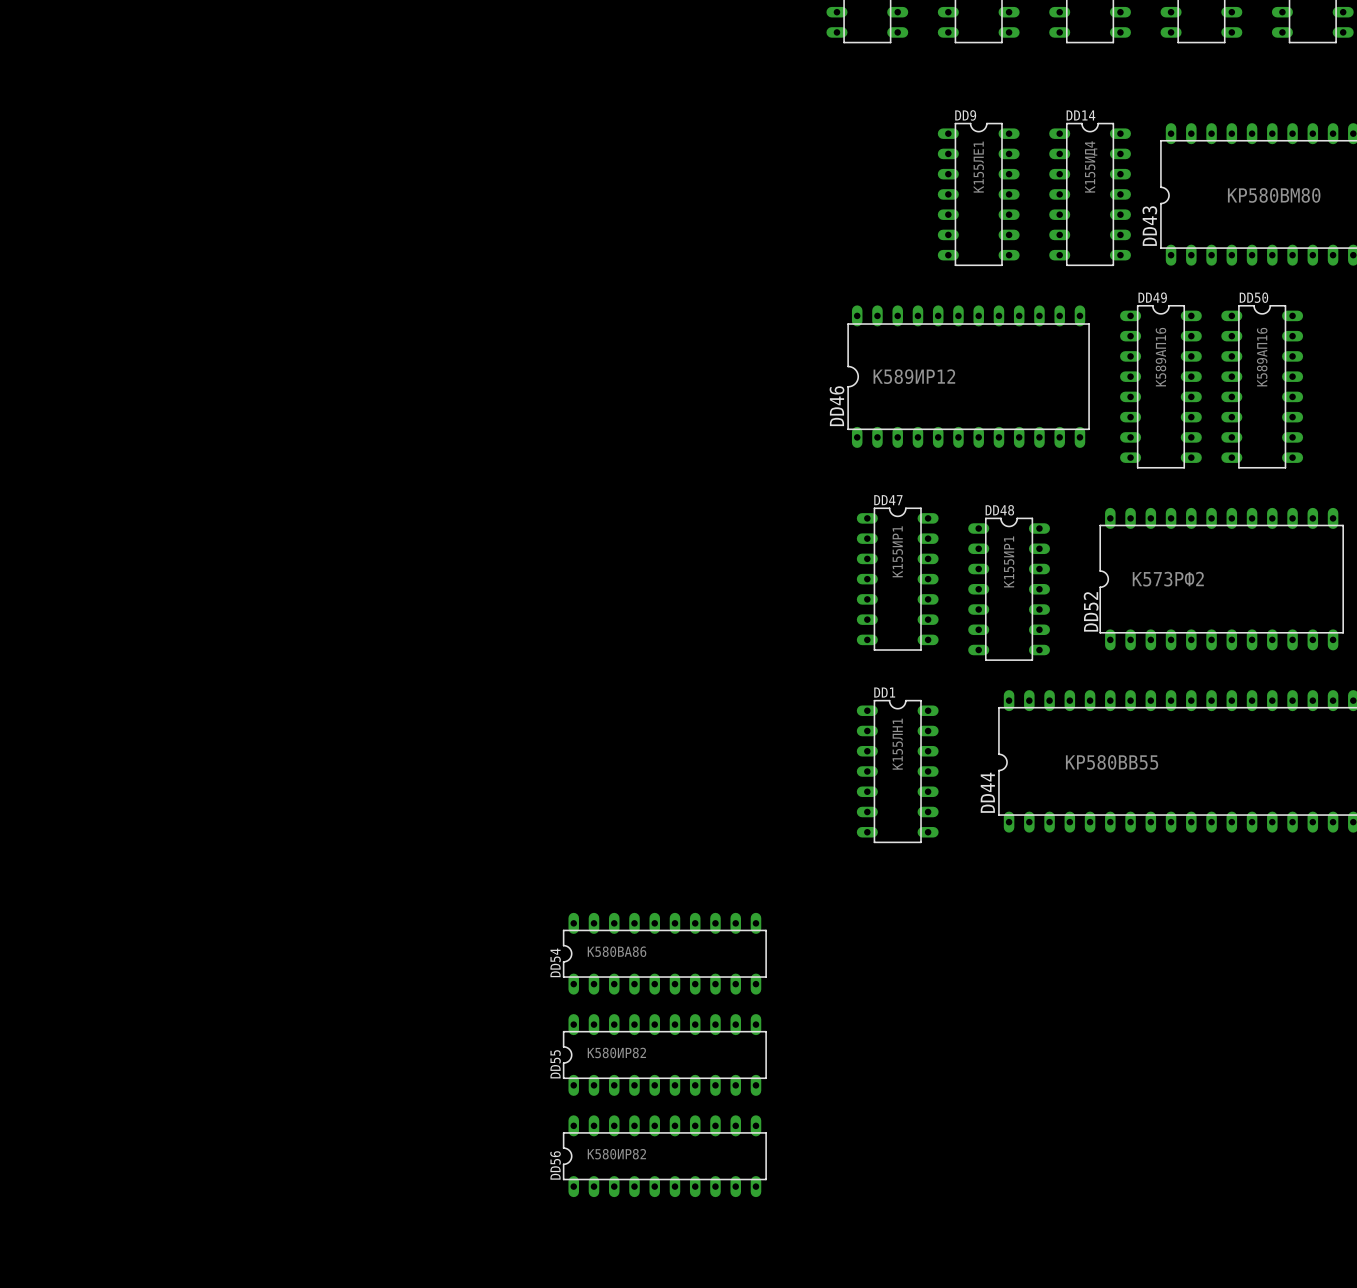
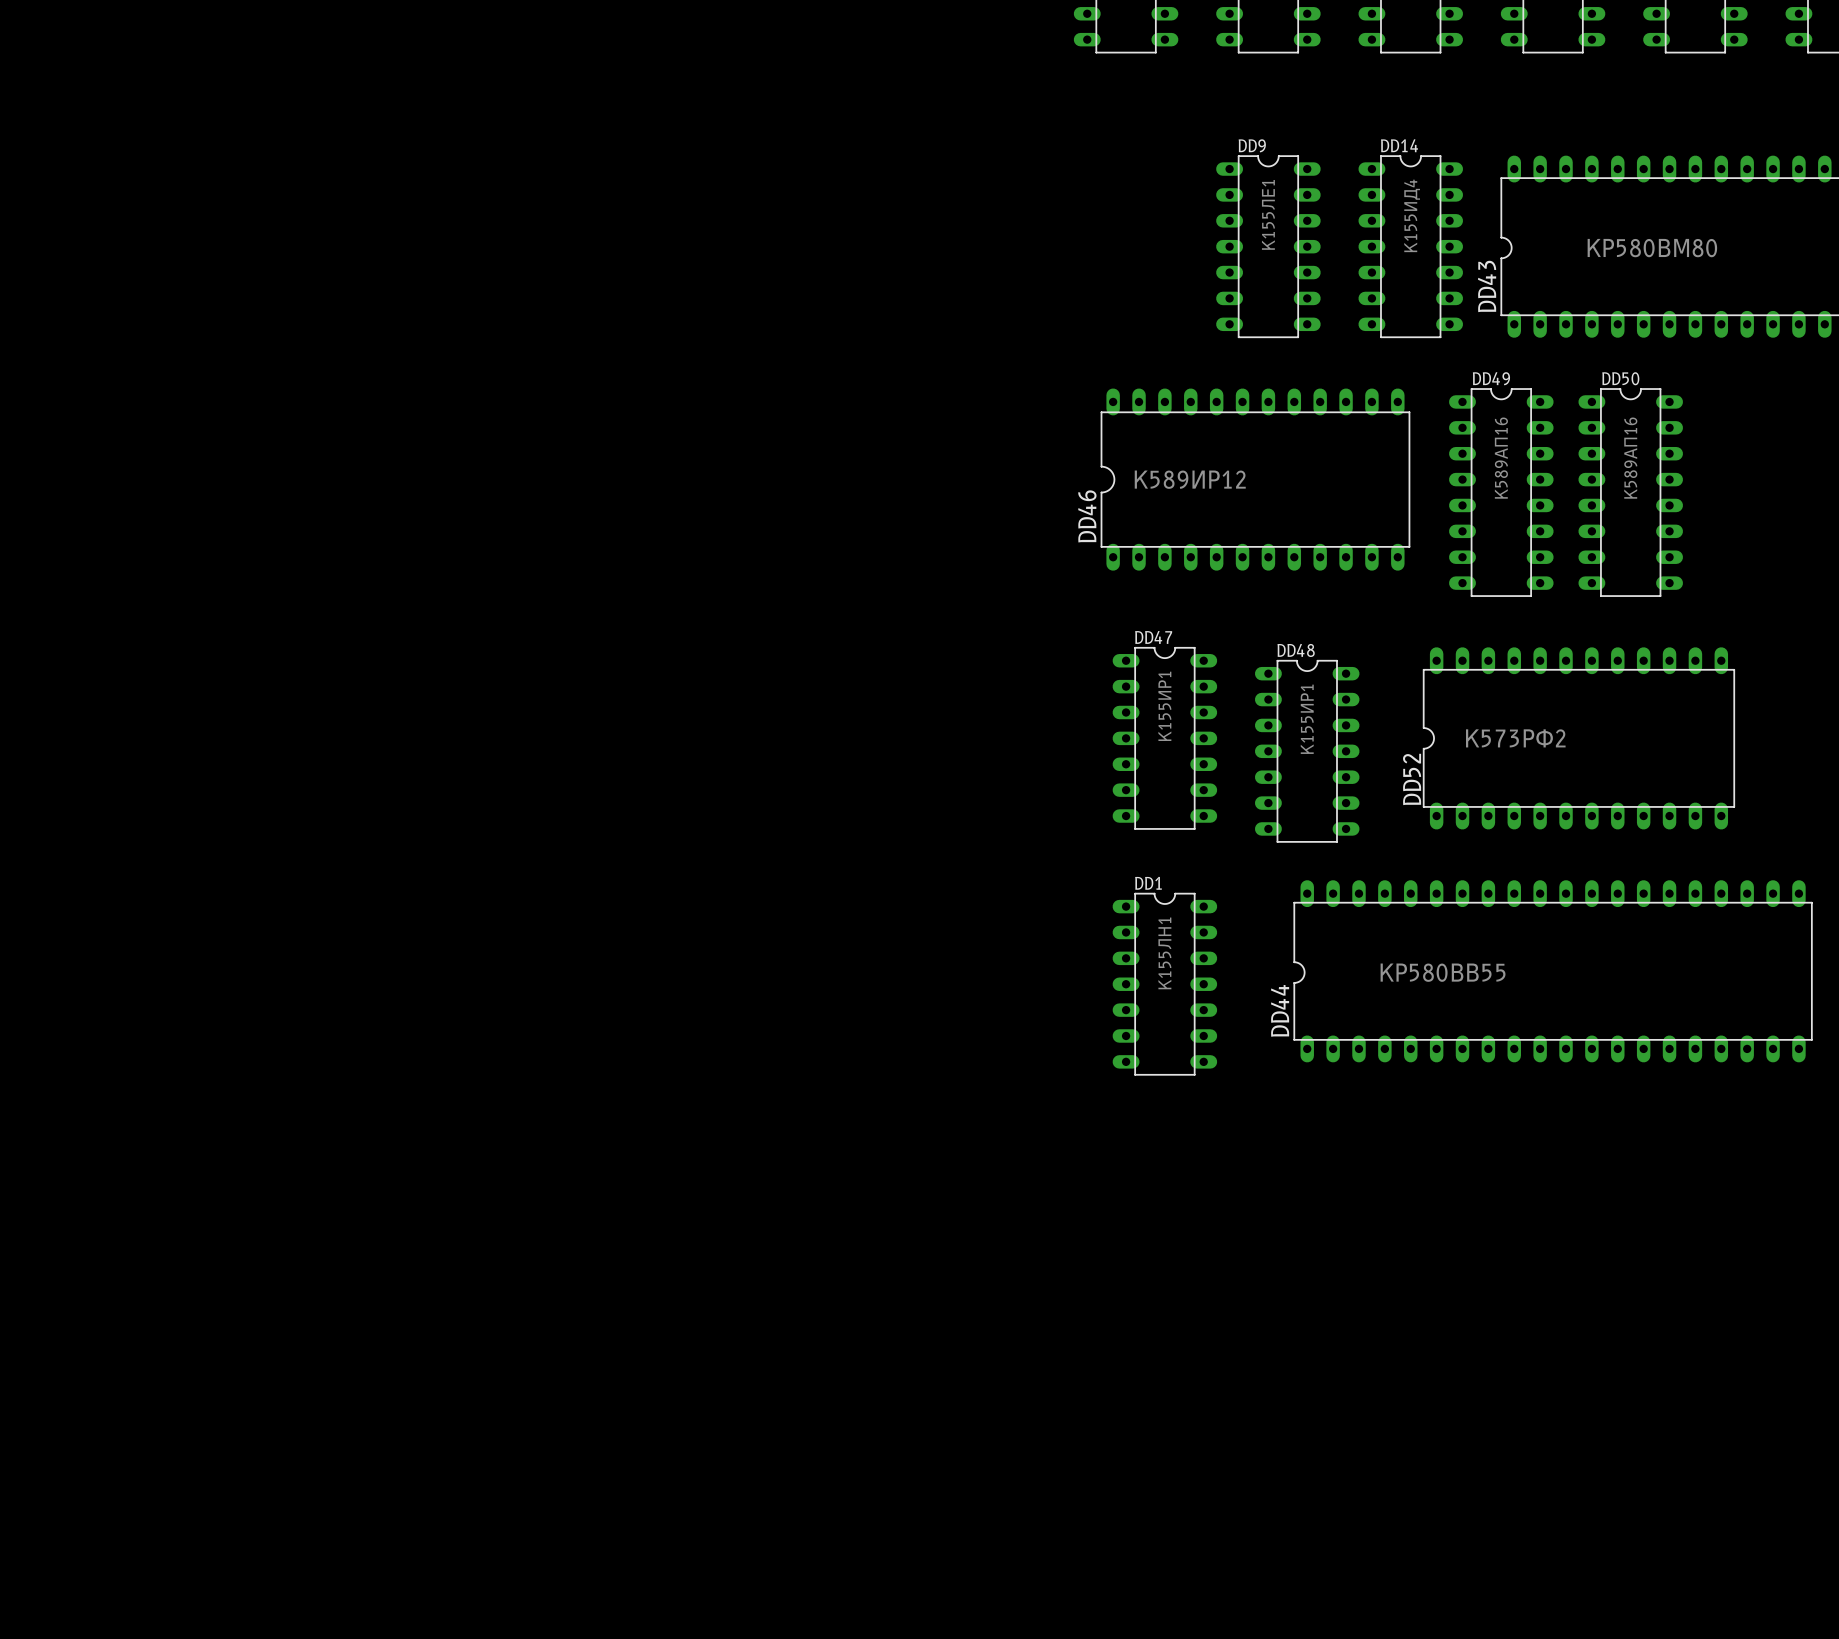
DD54: К580ВА86 (664, 953) -> none
DD55: К580ИР82 (664, 1054) -> none
DD56: К580ИР82 (664, 1156) -> none

